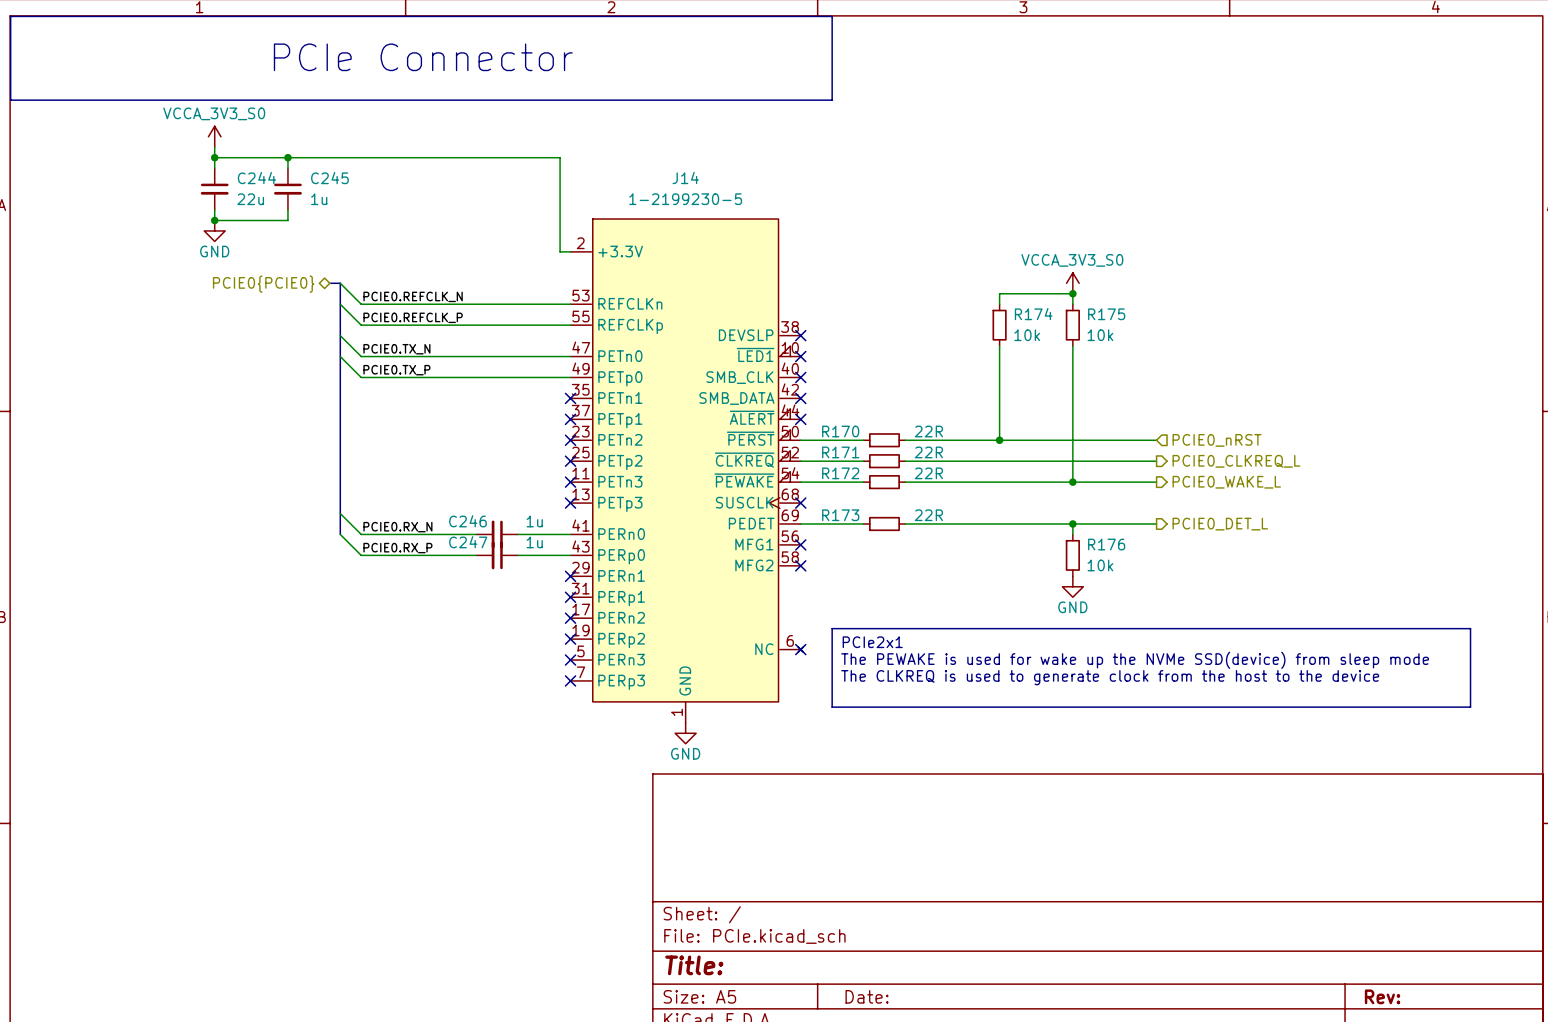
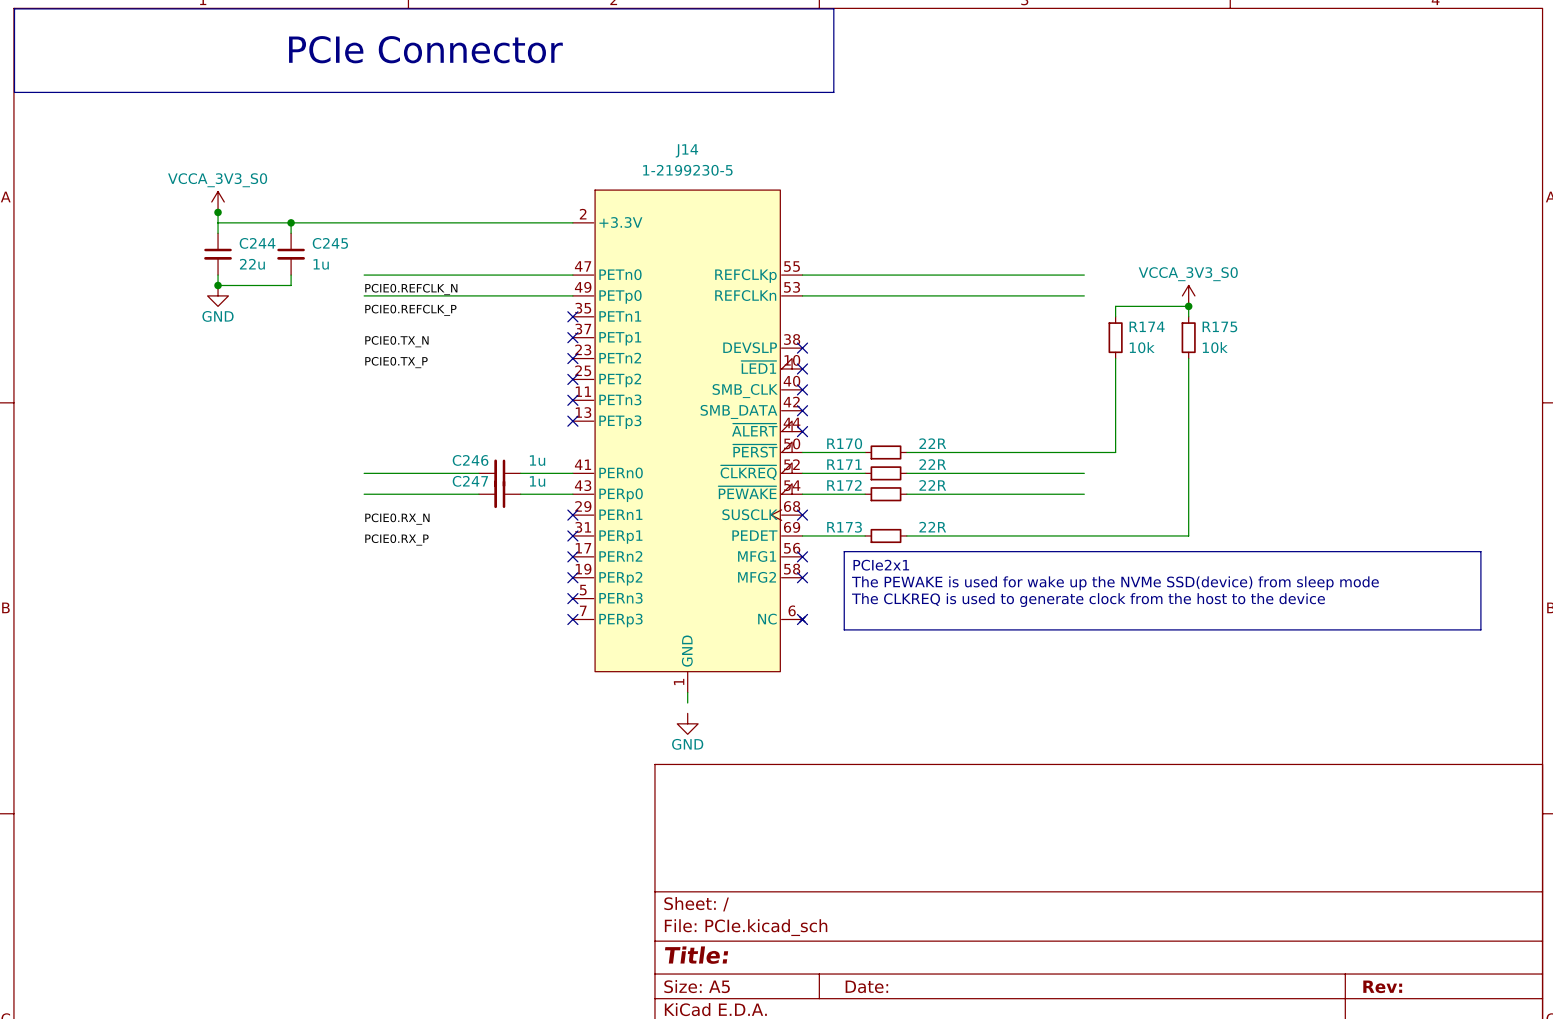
power symbol position: VCCA_3V3_S0 (214, 136) -> VCCA_3V3_S0 (218, 201)
wire: (214, 157) (560, 157) (560, 251) (570, 251) -> none
junction: (214, 157) -> none
wire: (287, 157) (287, 168) -> (291, 222) (291, 233)
junction: (287, 157) -> none
C244 position: (214, 189) -> (218, 254)
C245 position: (287, 189) -> (291, 254)
wire: (214, 210) (214, 220) (287, 220) (287, 210) -> (218, 275) (218, 285) (291, 285) (291, 275)
J14 symbol: [570, 219, 804, 723] -> [572, 190, 805, 693]
wire: none -> (218, 222) (572, 222)
power symbol position: GND (214, 230) -> GND (218, 295)
junction: none -> (291, 222)
bus: (329, 283) (340, 283) (340, 534) -> none
wire: (340, 283) (361, 304) -> none
wire: none -> (364, 275) (572, 275)
wire: none -> (802, 275) (1084, 275)
power symbol position: VCCA_3V3_S0 (1072, 283) -> VCCA_3V3_S0 (1188, 295)
hierarchical label: PCIE0{PCIE0} (263, 284) -> none
junction: none -> (218, 285)
junction: (1072, 293) -> none
wire: (340, 304) (361, 325) (570, 325) -> none
wire: none -> (802, 295) (1084, 295)
wire: (999, 304) (999, 293) (1072, 293) (1072, 304) -> (1115, 316) (1115, 306) (1188, 306) (1188, 316)
junction: none -> (1188, 306)
no-connect mark: none -> (572, 316)
R174 position: (999, 325) -> (1115, 337)
R175 position: (1072, 325) -> (1188, 337)
wire: (340, 335) (361, 356) (570, 356) -> none
no-connect mark: (800, 335) -> none
no-connect mark: none -> (572, 337)
wire: (999, 346) (999, 440) -> none
wire: (1072, 346) (1072, 482) -> none
wire: (340, 356) (361, 377) (570, 377) -> none
no-connect mark: none -> (572, 358)
wire: none -> (1188, 358) (1188, 535) (906, 535)
no-connect mark: none -> (572, 379)
no-connect mark: (570, 398) -> none
no-connect mark: none -> (572, 400)
no-connect mark: (570, 419) -> none
no-connect mark: none -> (572, 421)
no-connect mark: (570, 440) -> none
wire: (800, 440) (863, 440) -> (802, 535) (865, 535)
no-connect mark: none -> (802, 431)
R170: 22R (884, 440) -> none
wire: (905, 440) (1156, 440) -> none
junction: (999, 440) -> none
hierarchical label: PCIE0_nRST (1217, 440) -> none
R171 name: R171 (840, 452) -> R170 (844, 443)
no-connect mark: (570, 461) -> none
wire: (1114, 461) (1156, 461) -> (1115, 452) (1115, 358)
hierarchical label: PCIE0_CLKREQ_L (1236, 461) -> none
R172 name: R172 (840, 473) -> R171 (844, 464)
wire: none -> (364, 473) (478, 473)
no-connect mark: (570, 482) -> none
junction: (1072, 482) -> none
wire: (1083, 482) (1156, 482) -> none
hierarchical label: PCIE0_WAKE_L (1226, 482) -> none
wire: none -> (364, 494) (478, 494)
no-connect mark: (570, 503) -> none
no-connect mark: (800, 503) -> none
R172: none -> 22R (886, 494)
wire: none -> (906, 494) (1084, 494)
wire: (340, 513) (361, 534) (476, 534) -> none
no-connect mark: none -> (572, 515)
wire: (800, 523) (863, 523) -> (802, 494) (865, 494)
no-connect mark: none -> (802, 515)
R173 position: (884, 523) -> (886, 535)
wire: (905, 523) (1156, 523) -> none
wire: (1072, 523) (1072, 534) -> none
junction: (1072, 523) -> none
hierarchical label: PCIE0_DET_L (1220, 524) -> none
wire: (340, 534) (361, 555) (476, 555) -> none
C246 position: (497, 534) -> (499, 473)
wire: (518, 534) (570, 534) -> (520, 473) (572, 473)
no-connect mark: none -> (572, 535)
no-connect mark: (800, 544) -> none
C247 position: (497, 555) -> (499, 494)
wire: (518, 555) (570, 555) -> (520, 494) (572, 494)
R176: 10k (1072, 555) -> none
no-connect mark: none -> (572, 556)
no-connect mark: (570, 576) -> none
no-connect mark: none -> (572, 577)
no-connect mark: none -> (802, 577)
power symbol: GND (1072, 586) -> none
no-connect mark: (570, 597) -> none
no-connect mark: none -> (572, 598)
no-connect mark: (570, 618) -> none
no-connect mark: none -> (572, 619)
line: (832, 628) (1470, 628) (1470, 707) (832, 707) (832, 628) -> (844, 551) (1480, 551) (1480, 629) (844, 629) (844, 551)
no-connect mark: (570, 639) -> none
text position: PCIe2x1 (872, 642) -> PCIe2x1 (881, 565)
no-connect mark position: (800, 649) -> (802, 619)
no-connect mark: (570, 660) -> none
text position: The PEWAKE is used for wake up the NVMe SSD(device) from sleep mode (1135, 660) -> The PEWAKE is used for wake up the NVMe SSD(device) from sleep mode (1115, 583)
text position: The CLKREQ is used to generate clock from the host to the device (1110, 677) -> The CLKREQ is used to generate clock from the host to the device (1088, 600)
no-connect mark: (570, 680) -> none

